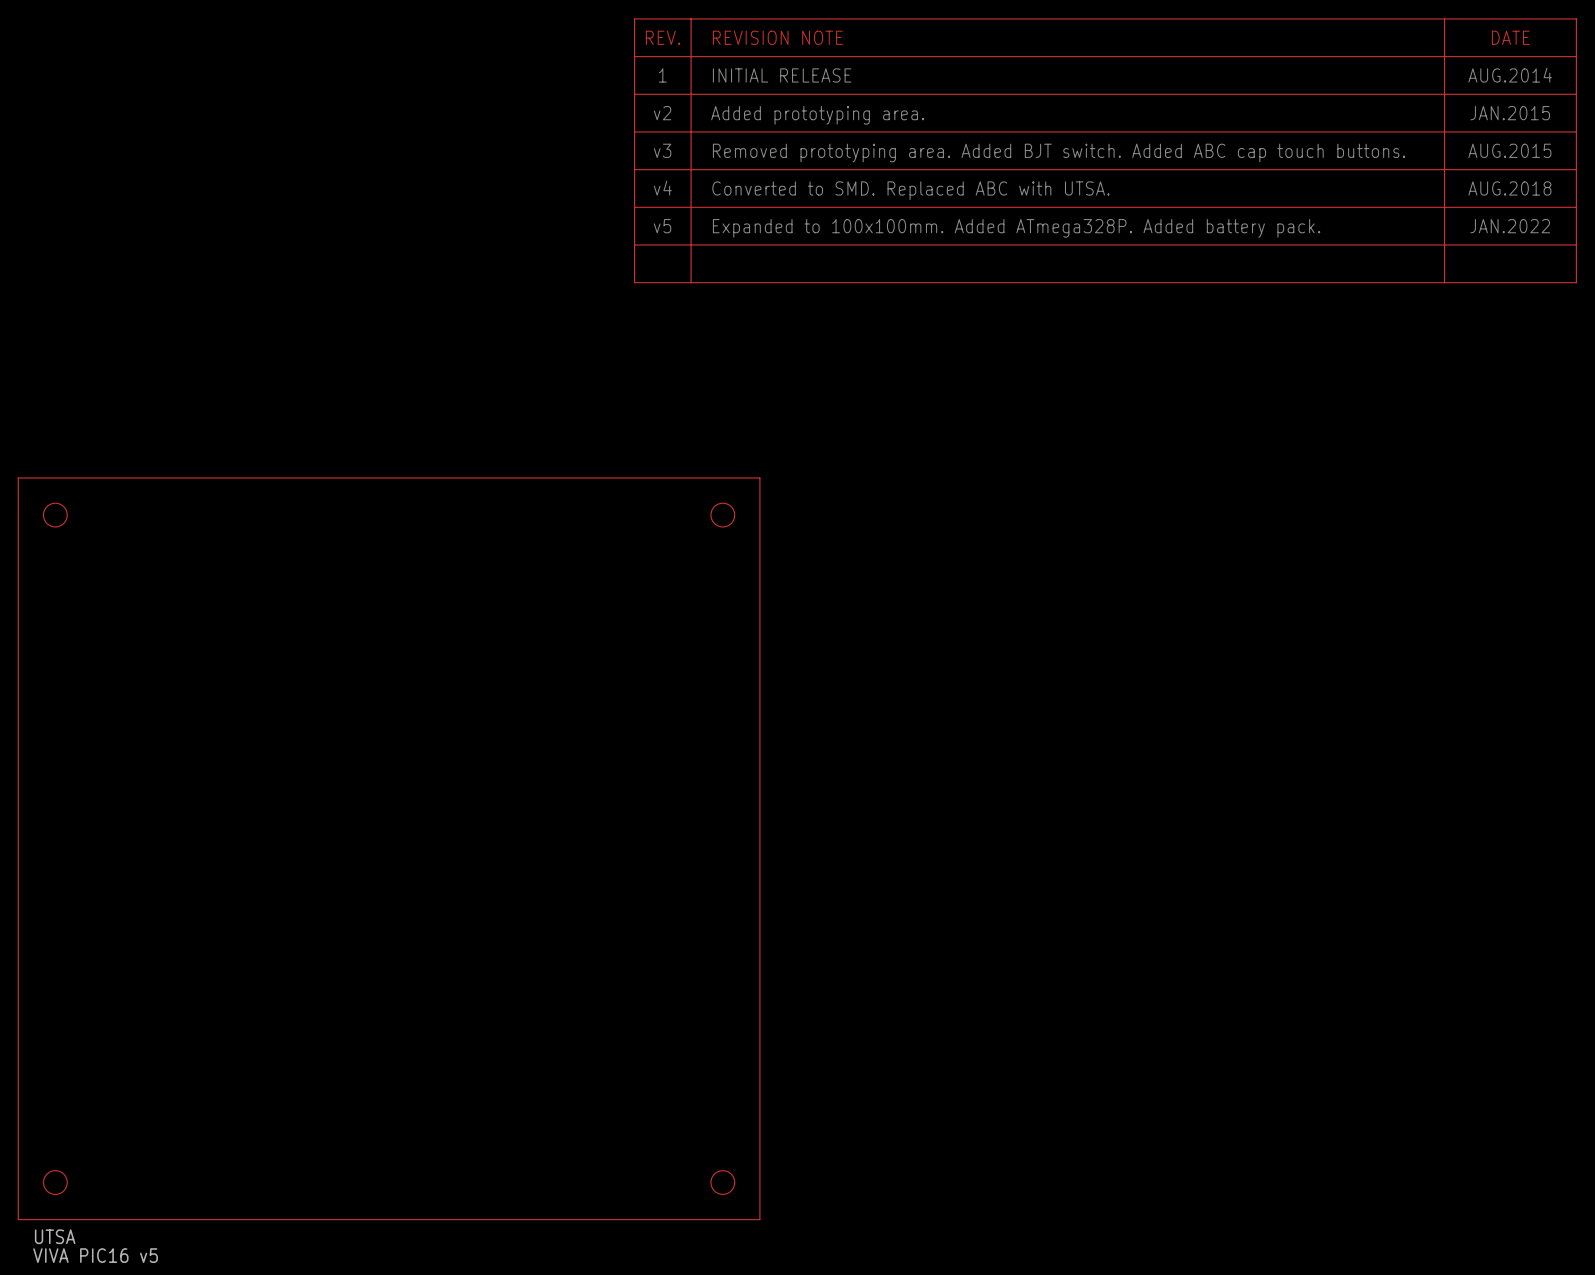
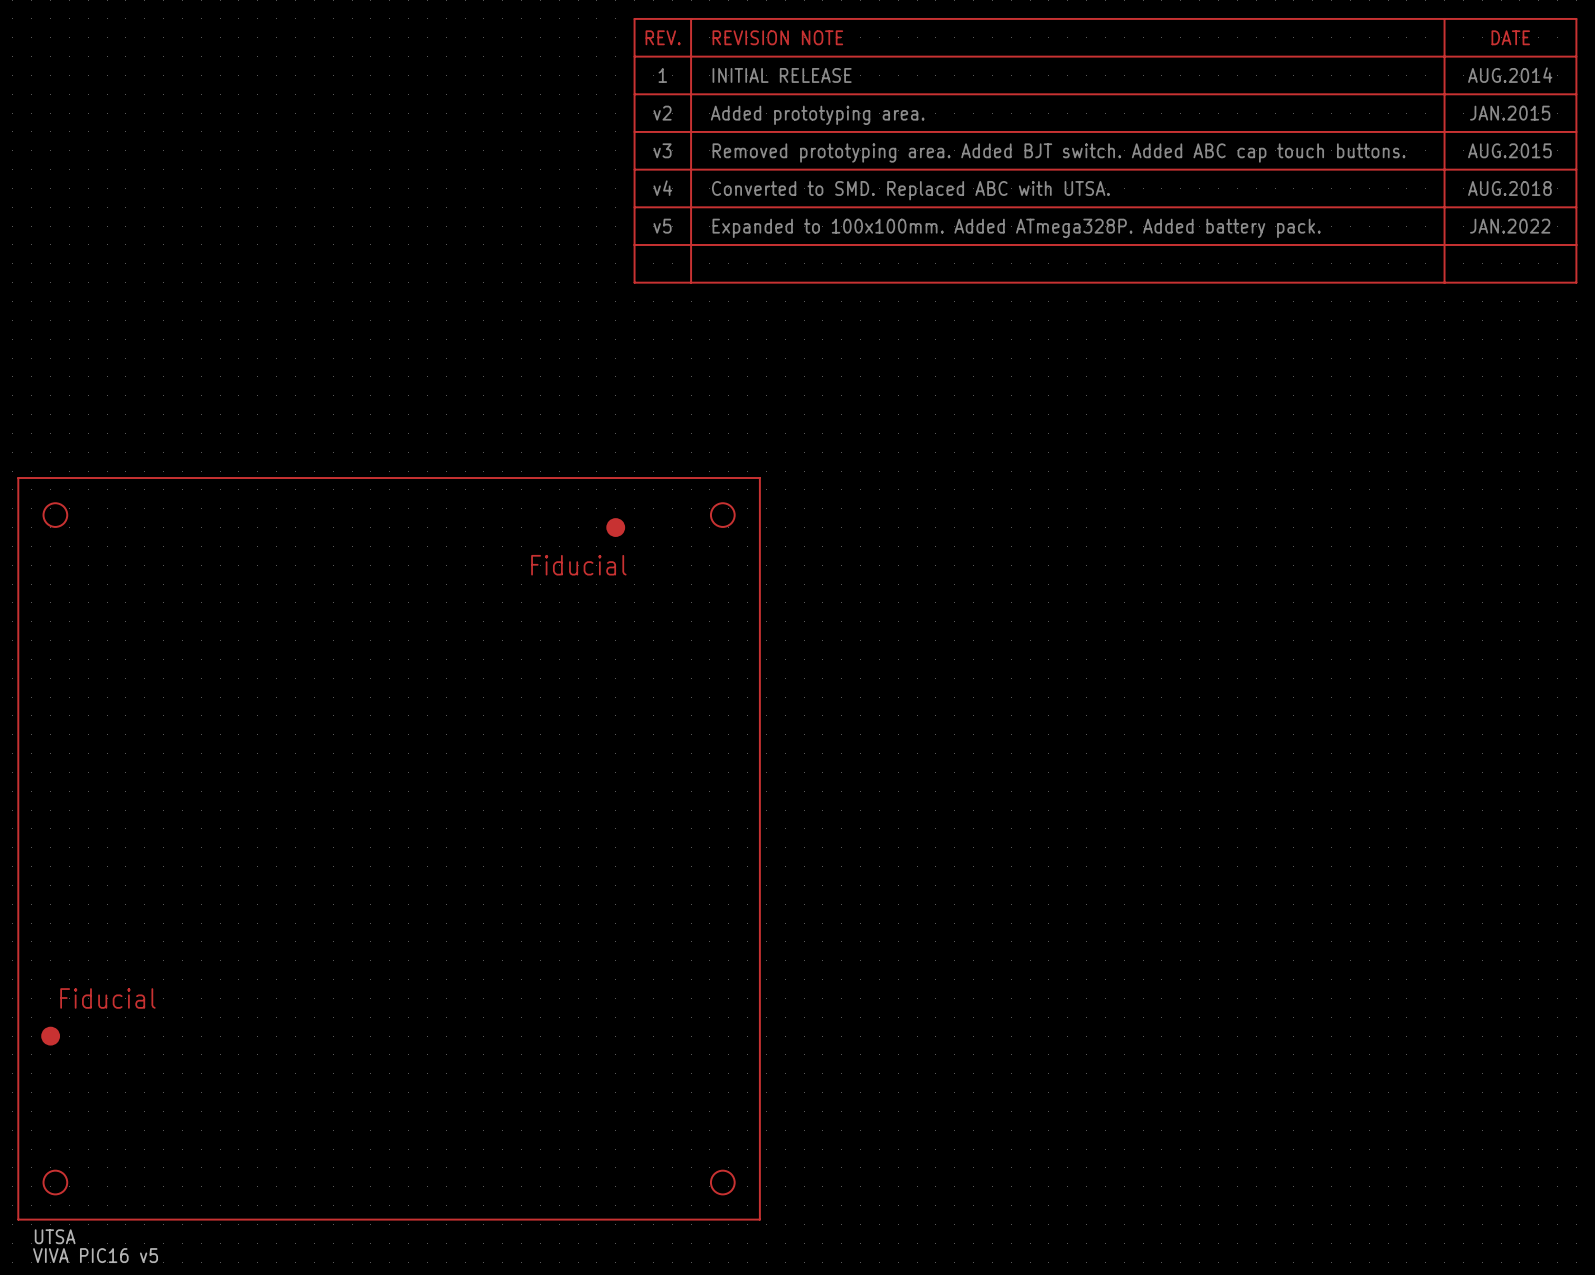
part: none -> (615, 527)
text: none -> Fiducial (578, 565)
text: none -> Fiducial (107, 998)
part: none -> (50, 1036)

